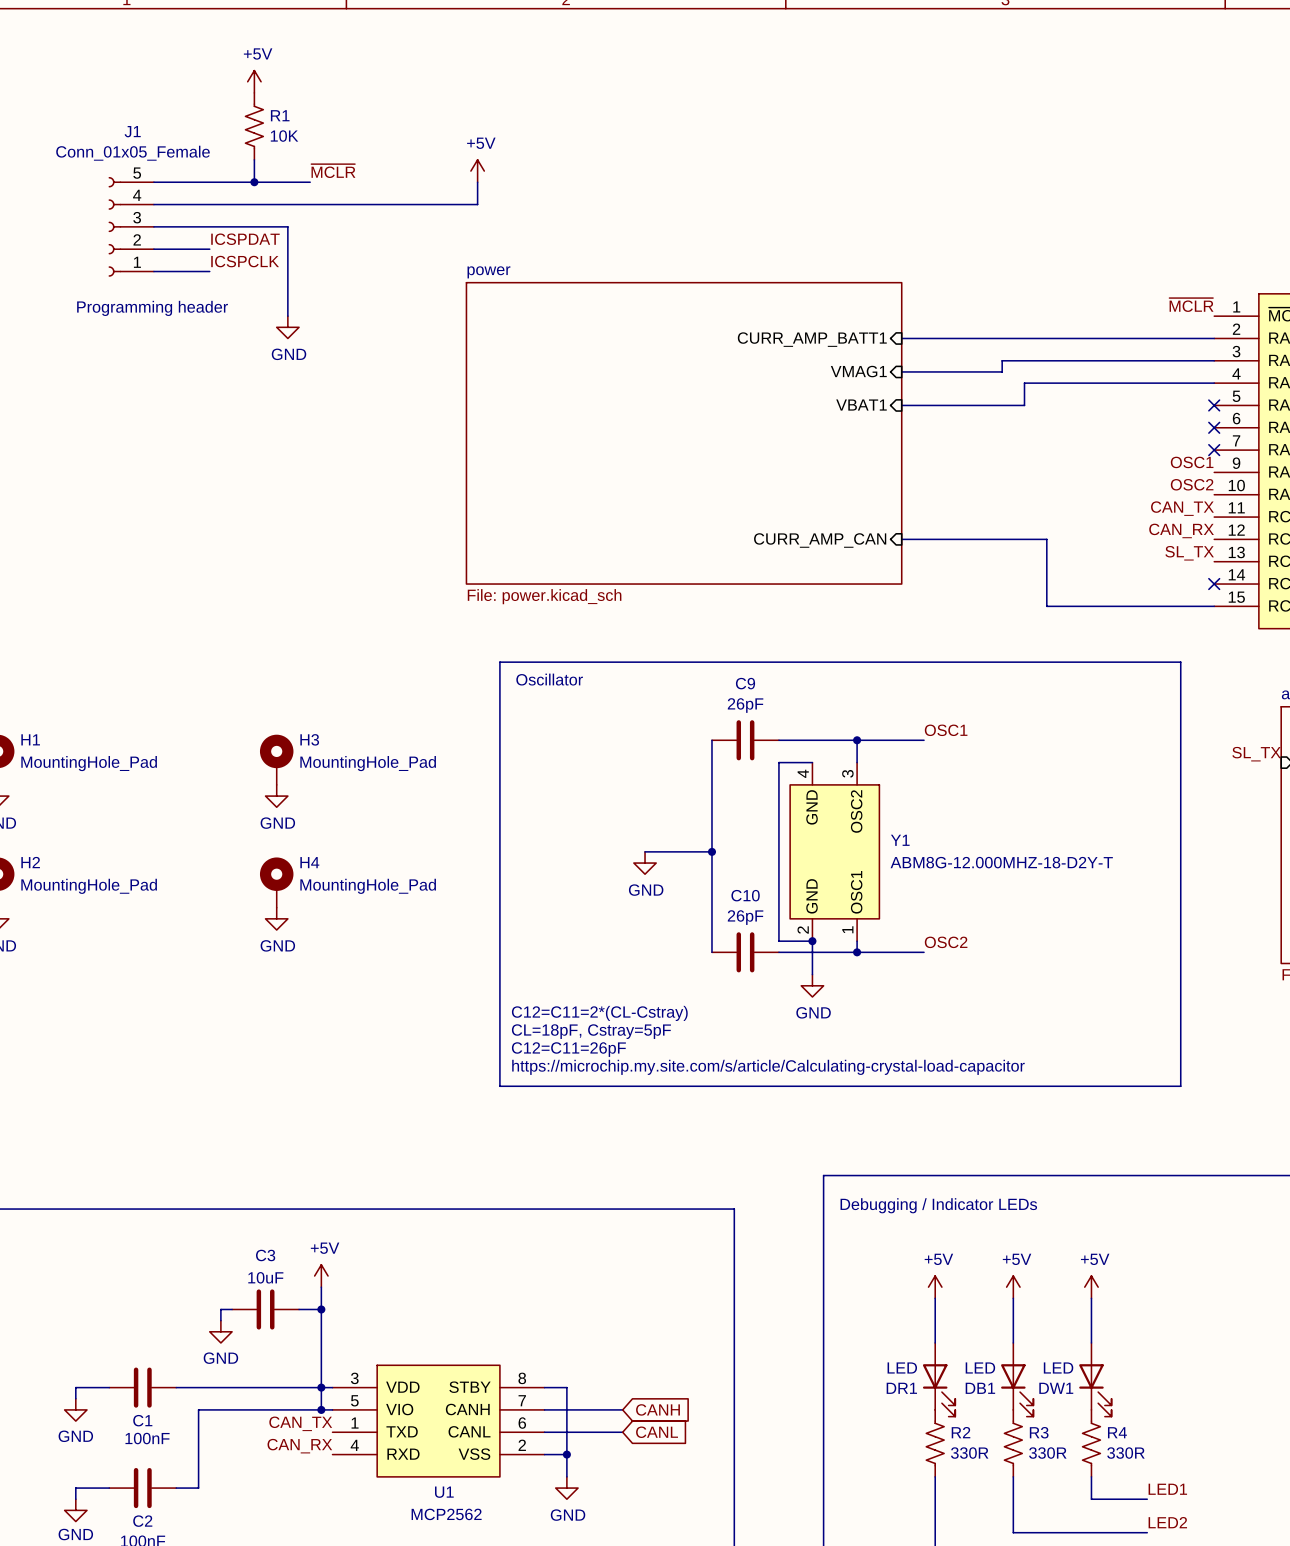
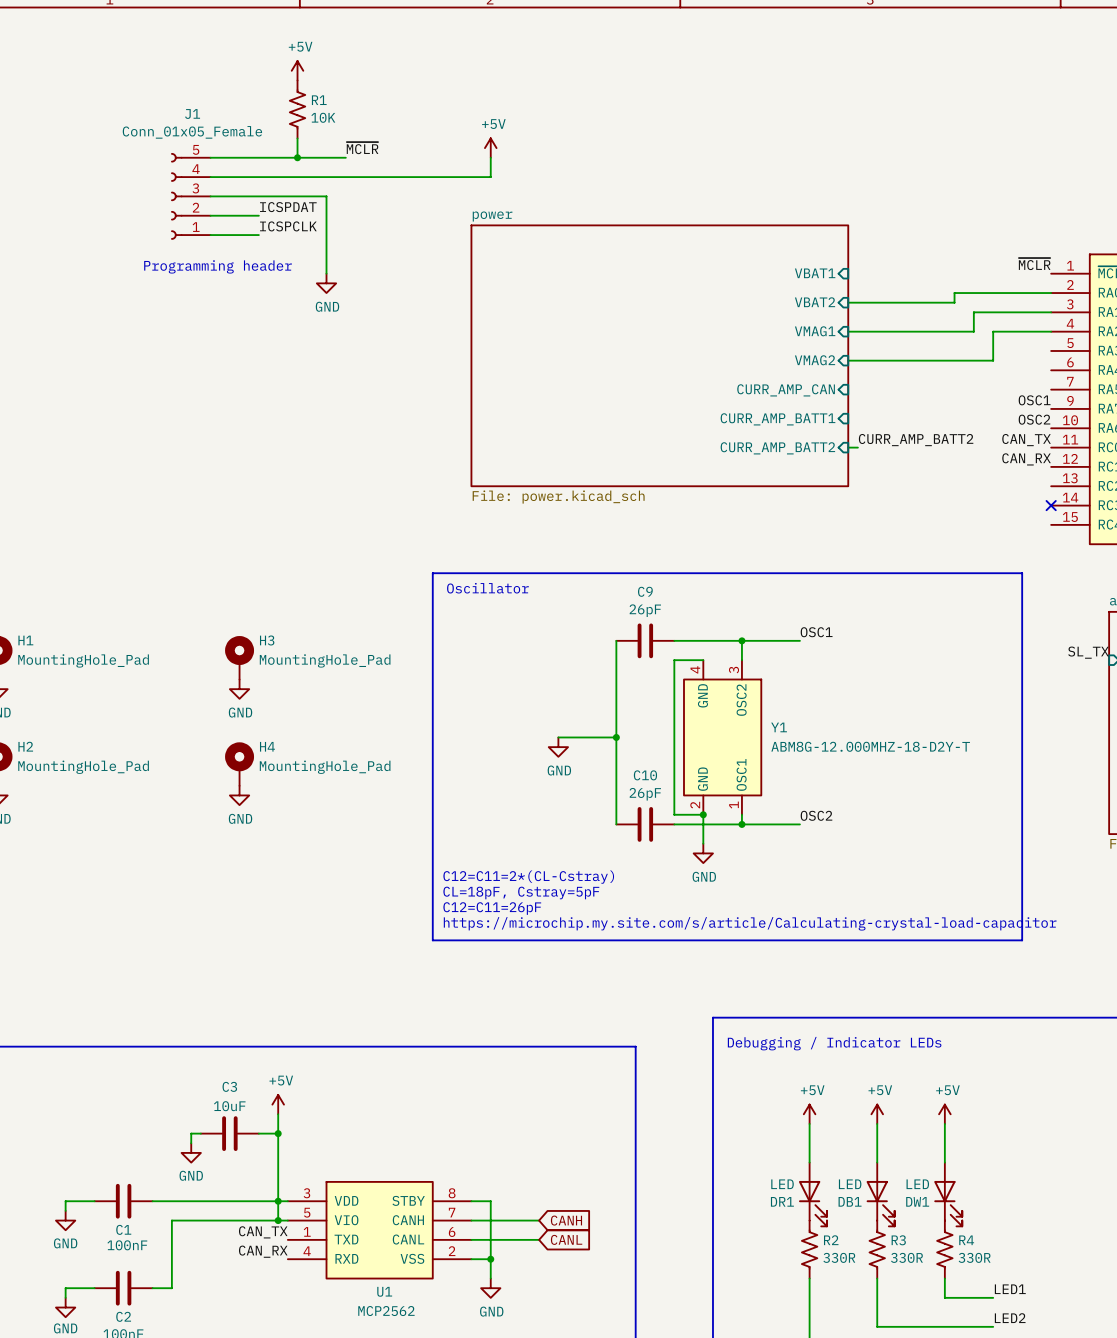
power symbol: +5V (254, 81) -> none
power symbol: none -> +5V (297, 70)
R1 position: (254, 126) -> (297, 109)
wire: (254, 159) (254, 182) -> (297, 138) (297, 157)
label position: ~{MCLR} (333, 171) -> ~{MCLR} (362, 148)
power symbol: +5V (477, 171) -> none
power symbol: none -> +5V (490, 148)
wire: (153, 182) (243, 182) -> (268, 157) (345, 157)
junction: (254, 182) -> none
junction: none -> (297, 157)
wire: (477, 182) (477, 204) -> (490, 157) (490, 177) (413, 177)
wire: (153, 204) (243, 204) -> none
J1 position: (131, 226) -> (190, 196)
wire: (153, 226) (243, 226) -> none
wire: (287, 226) (287, 316) -> (249, 196) (326, 196) (326, 273)
label position: ICSPDAT (245, 239) -> ICSPDAT (288, 207)
wire: (153, 249) (209, 249) -> (210, 215) (258, 215)
label position: ICSPCLK (245, 261) -> ICSPCLK (288, 226)
wire: (153, 271) (209, 271) -> (210, 235) (258, 235)
text position: Programming header (152, 308) -> Programming header (218, 266)
power symbol position: GND (287, 327) -> GND (326, 283)
wire: (901, 338) (1102, 338) -> (848, 302) (954, 302) (954, 293)
sheet pin position: CURR_AMP_BATT1 (812, 339) -> CURR_AMP_BATT1 (778, 419)
sheet pin: none -> VBAT2 (815, 302)
wire: (1124, 360) (1002, 360) (1002, 371) (901, 371) -> none
sheet pin position: VMAG1 (858, 371) -> VMAG1 (815, 331)
wire: (1024, 383) (1024, 405) (901, 405) -> (886, 331) (848, 331)
wire: (1124, 383) (1147, 383) -> (973, 331) (973, 312)
wire: none -> (993, 331) (993, 360) (848, 360)
sheet pin position: VBAT1 (861, 405) -> VBAT1 (815, 273)
no-connect mark: (1214, 405) -> none
sheet pin: none -> VMAG2 (815, 360)
no-connect mark: (1214, 427) -> none
sheet power position: (684, 433) -> (659, 355)
no-connect mark: (1214, 450) -> none
label: none -> CURR_AMP_BATT2 (916, 440)
wire: none -> (848, 447) (857, 447)
sheet pin: none -> CURR_AMP_BATT2 (777, 448)
wire: (901, 539) (1046, 539) (1046, 606) (1214, 606) -> none
sheet pin position: CURR_AMP_CAN (820, 540) -> CURR_AMP_CAN (786, 390)
label: SL_TX (1189, 553) -> none

